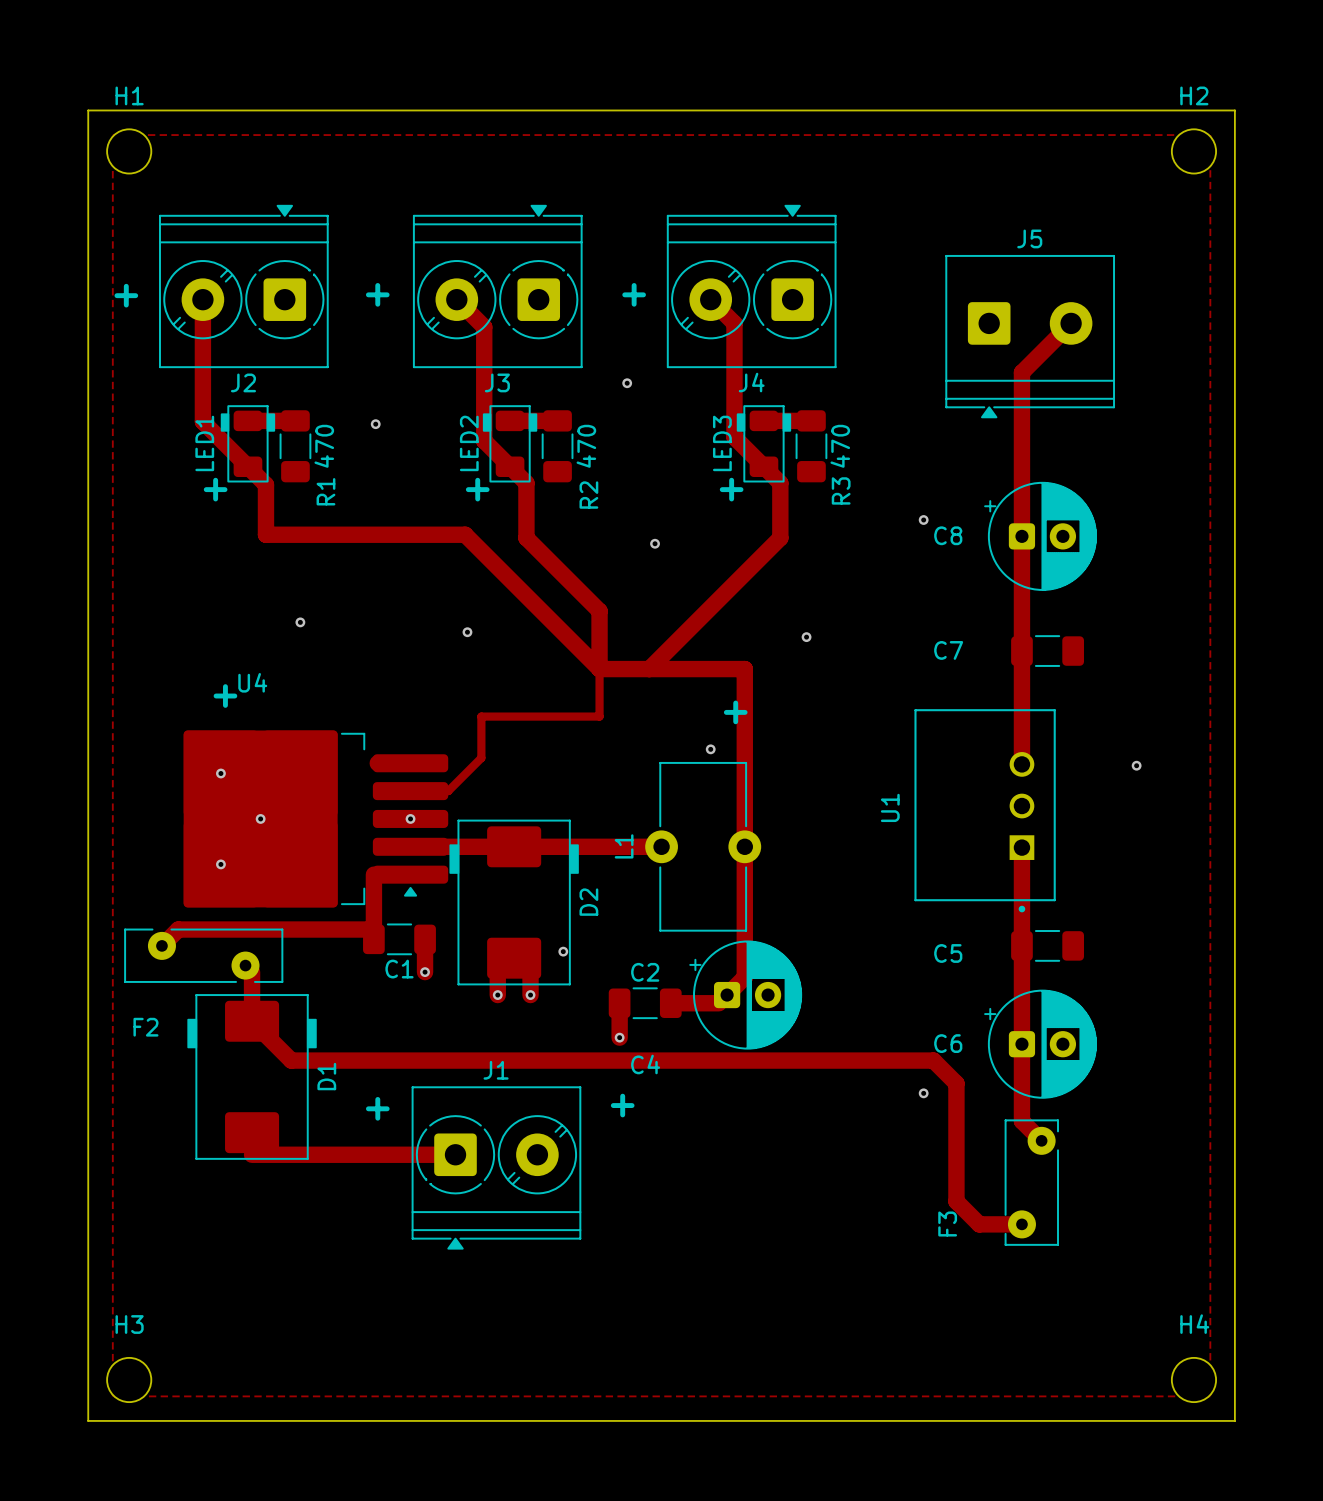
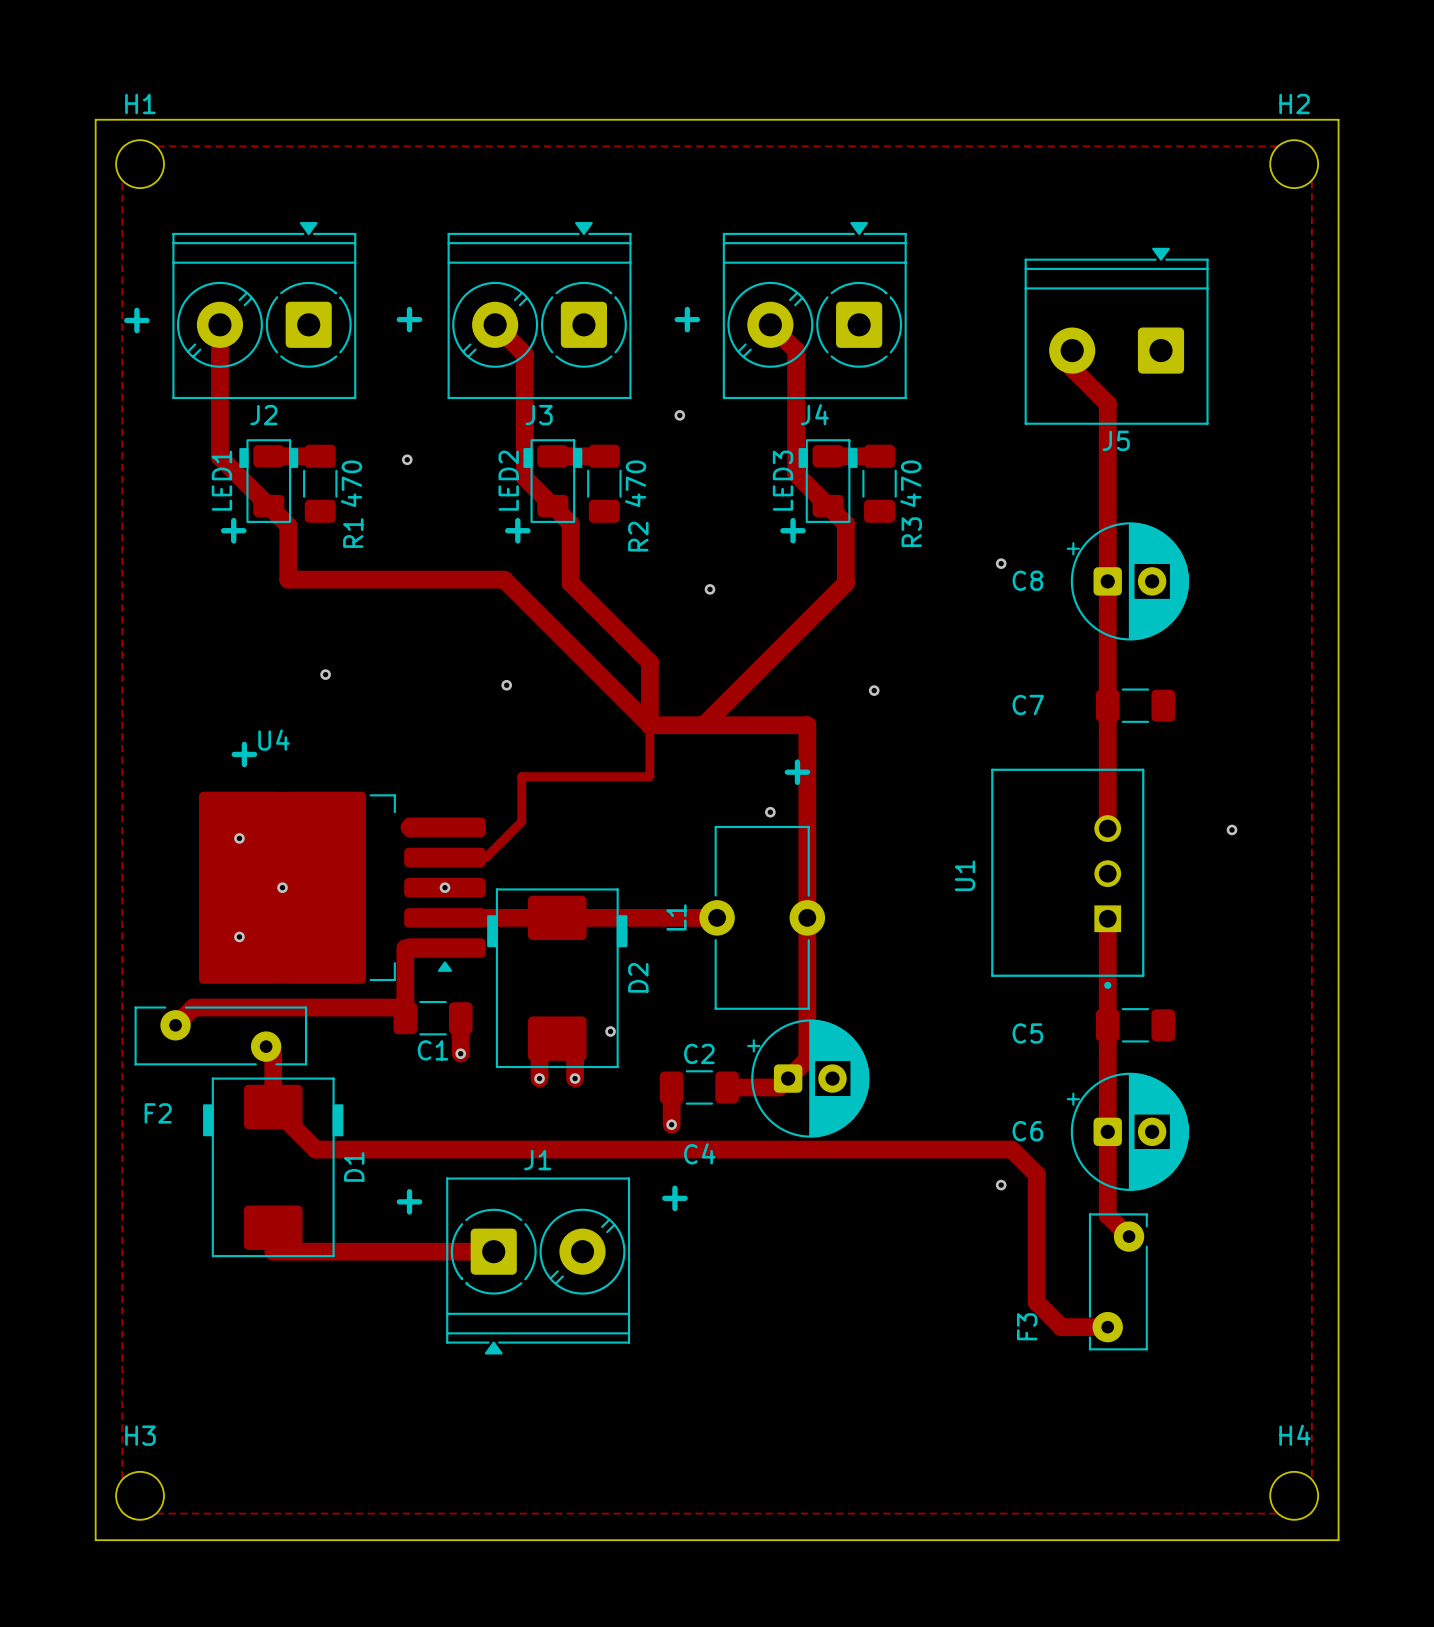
track: (1071, 323) (1021, 372) -> (1072, 350) (1072, 368) (1107, 403)
J5 rotation: 0° (1030, 336) -> 180° (1116, 336)

